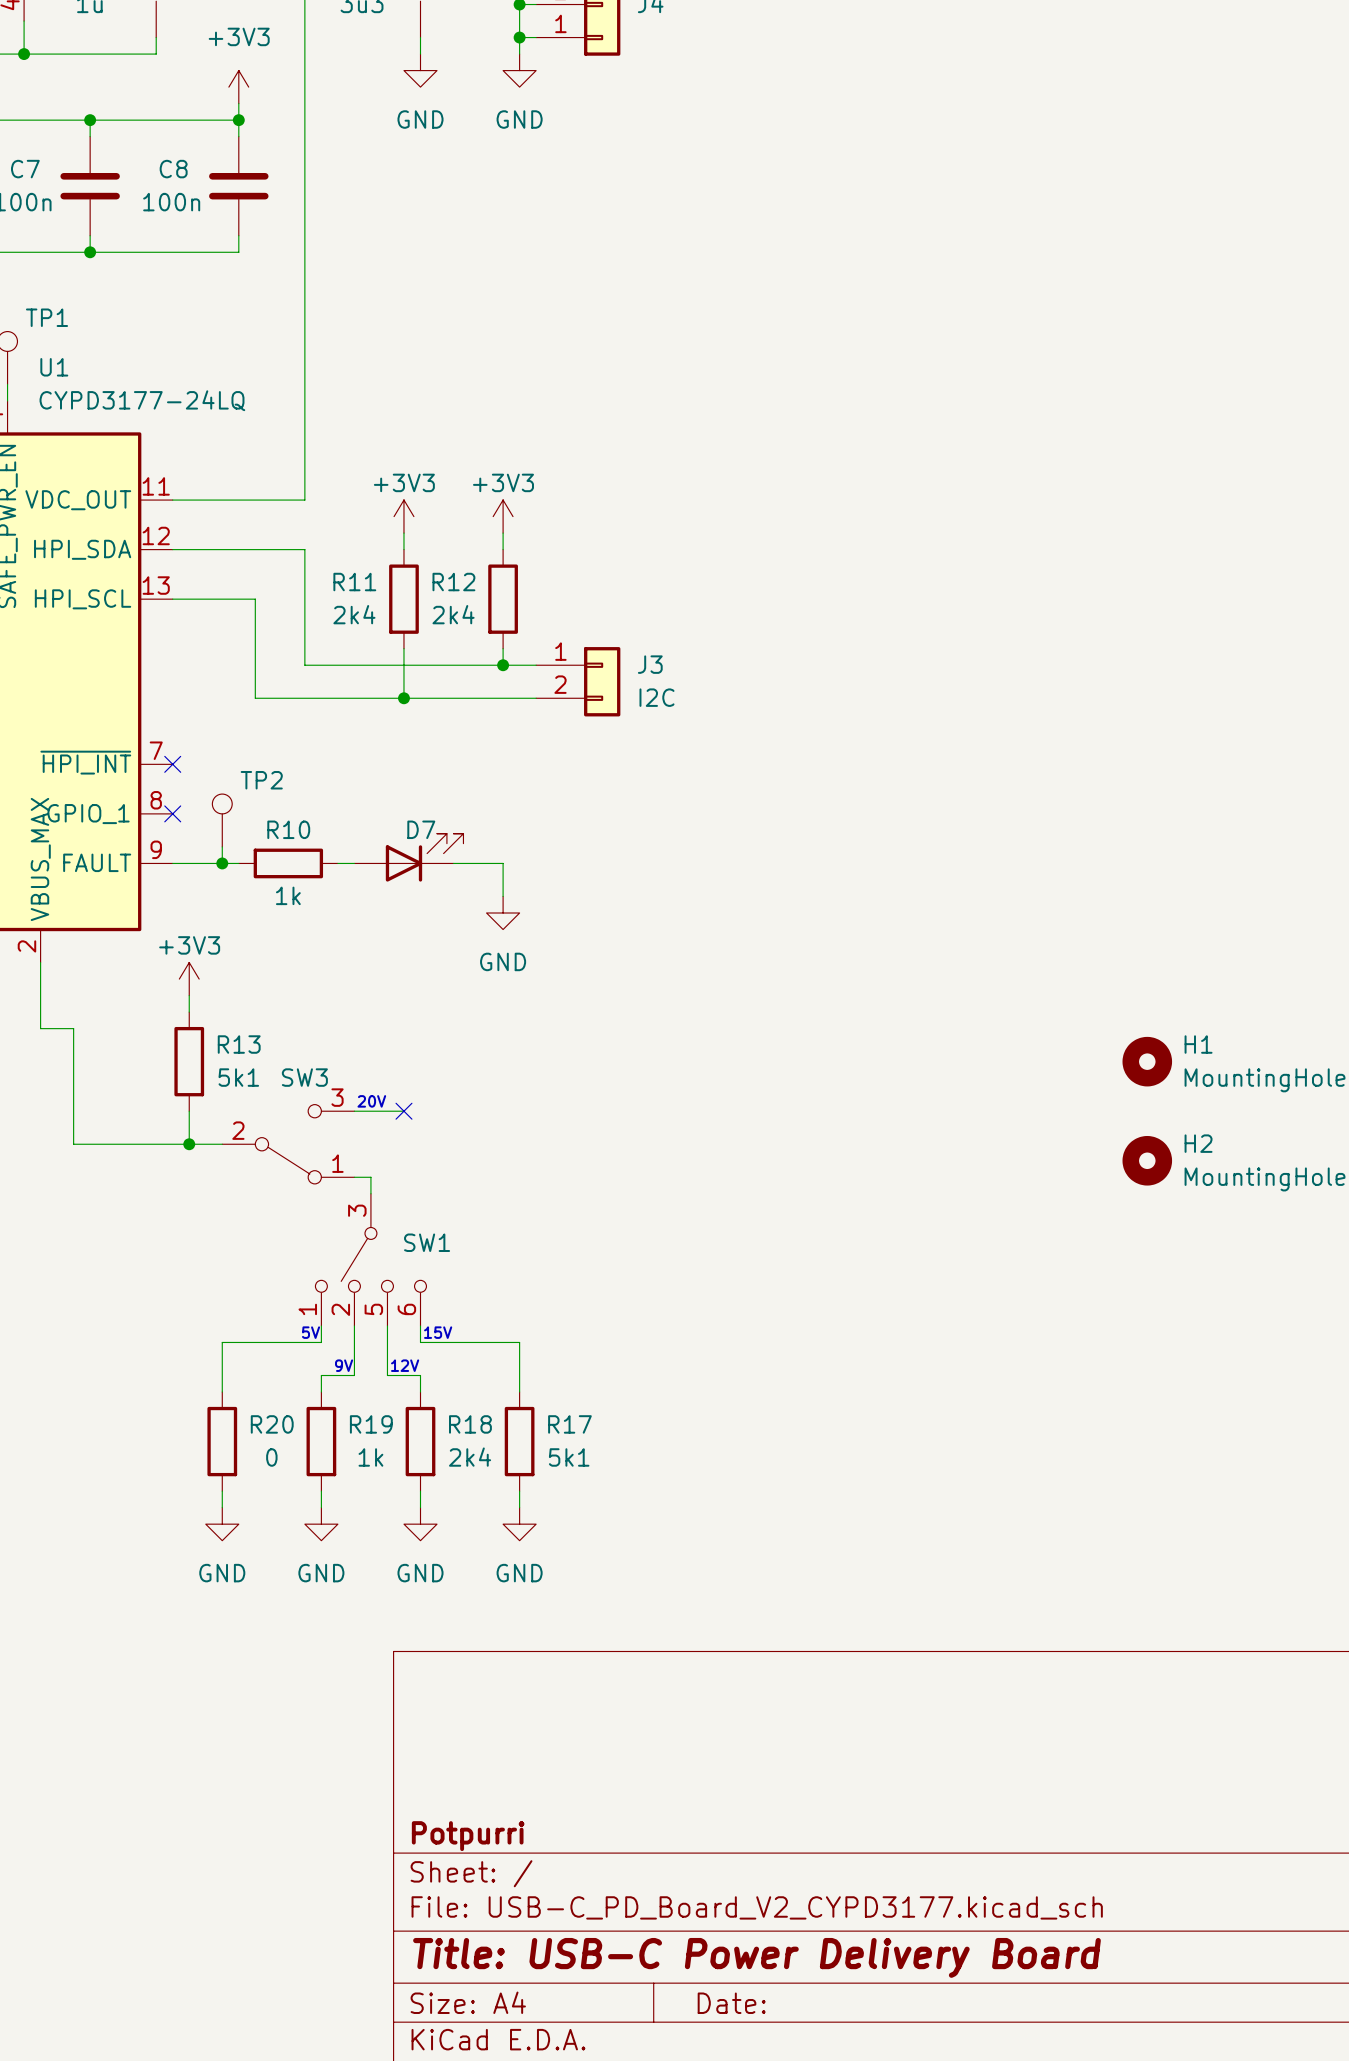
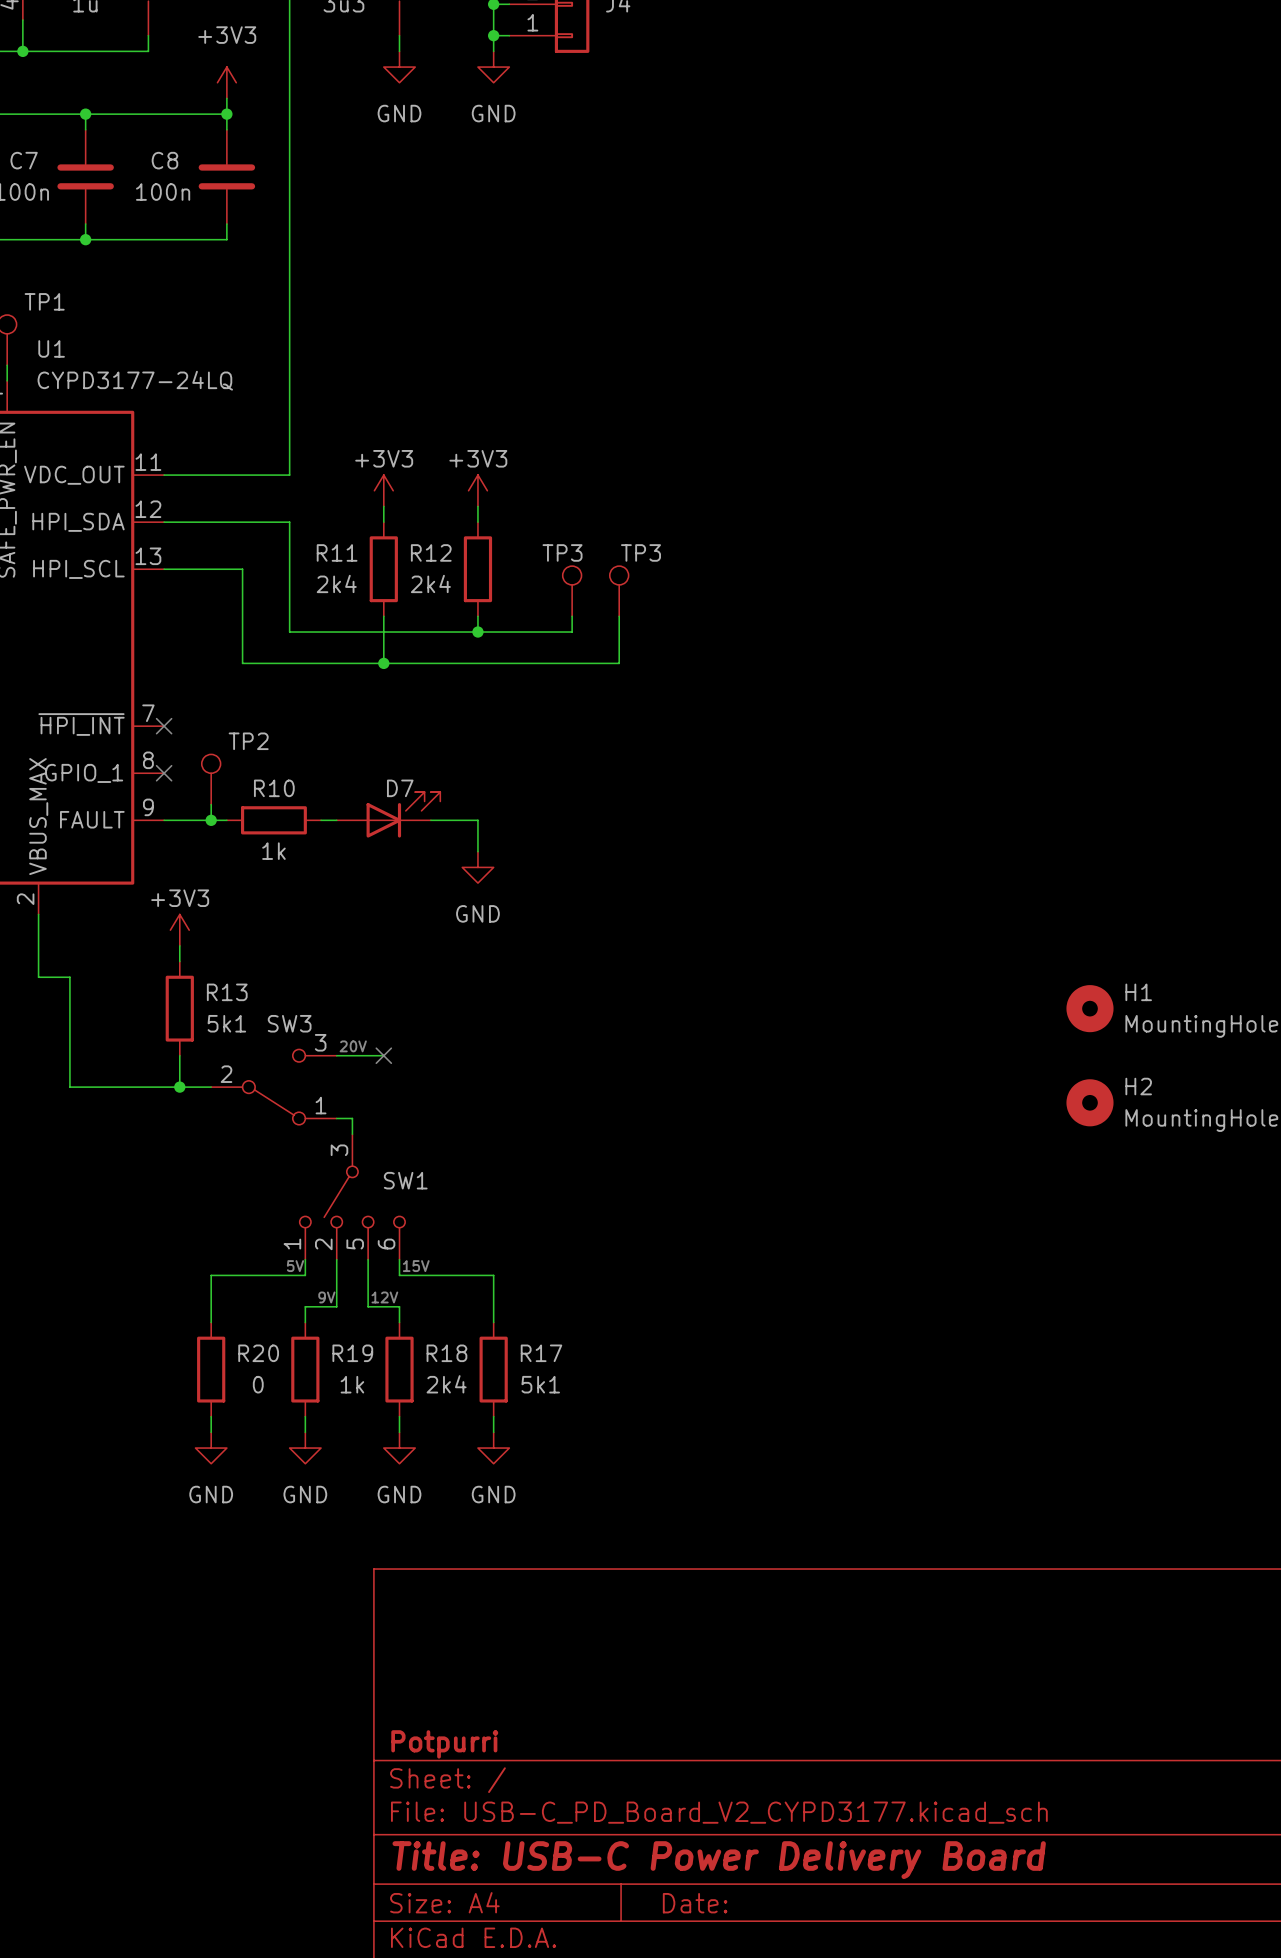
TP3: none -> (572, 591)
TP3: none -> (619, 591)
wire: none -> (619, 616) (619, 663) (509, 663)
J3: I2C (578, 681) -> none

